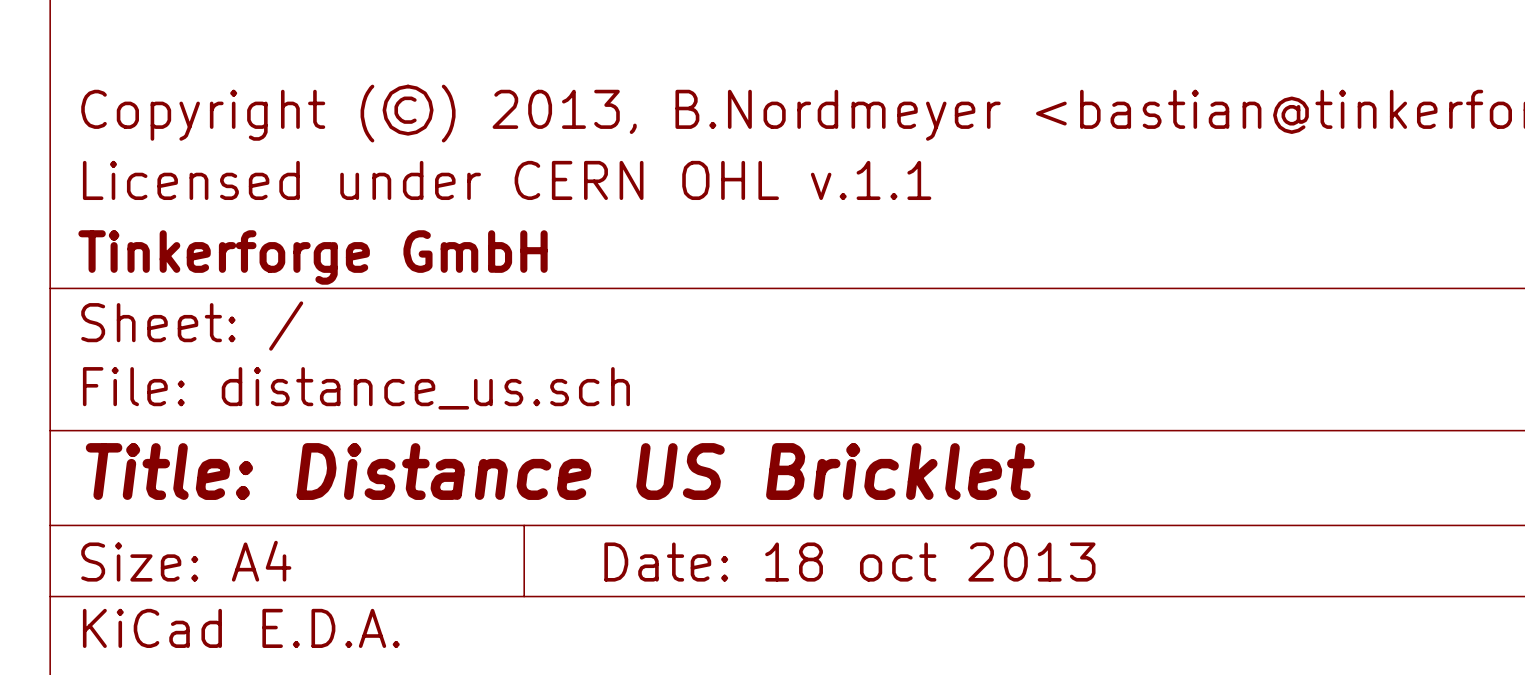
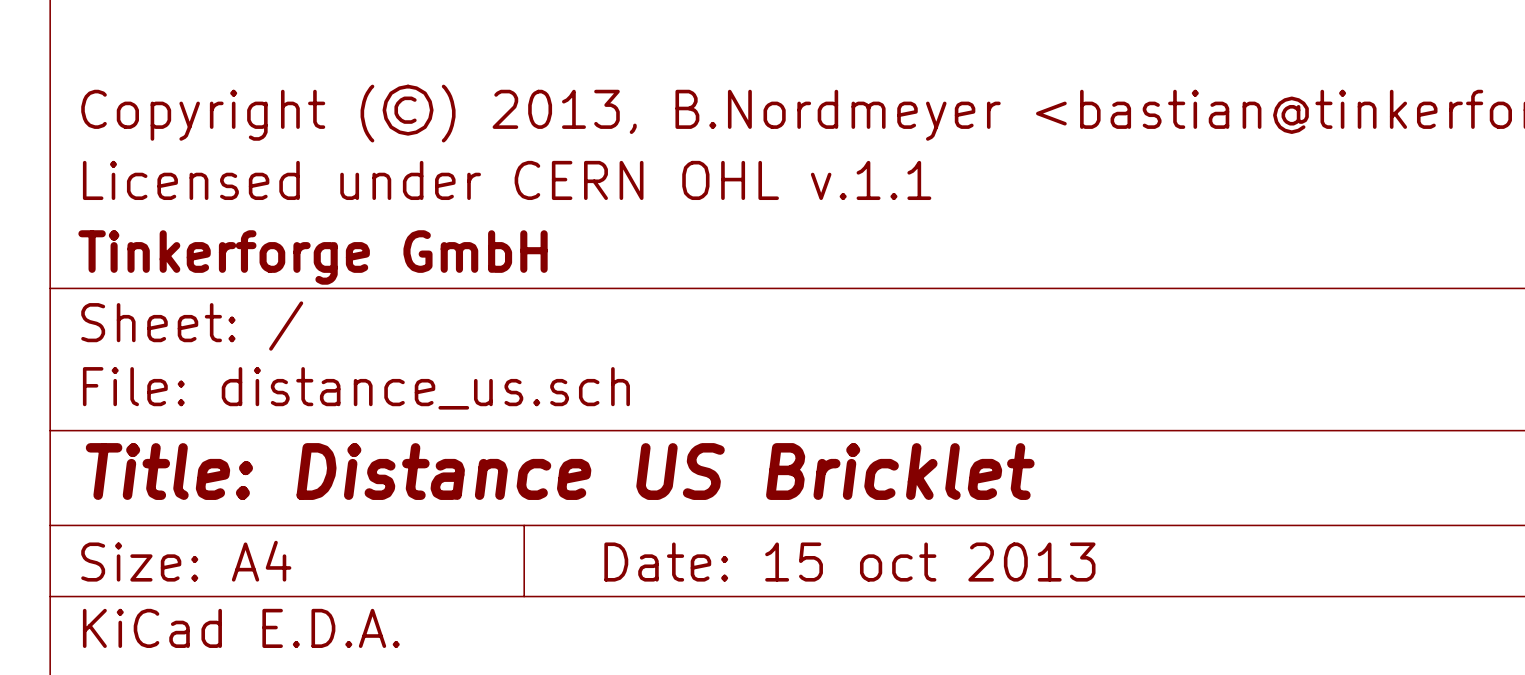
title block: Date: 18 oct 2013 (849, 562) -> Date: 15 oct 2013 (849, 562)

